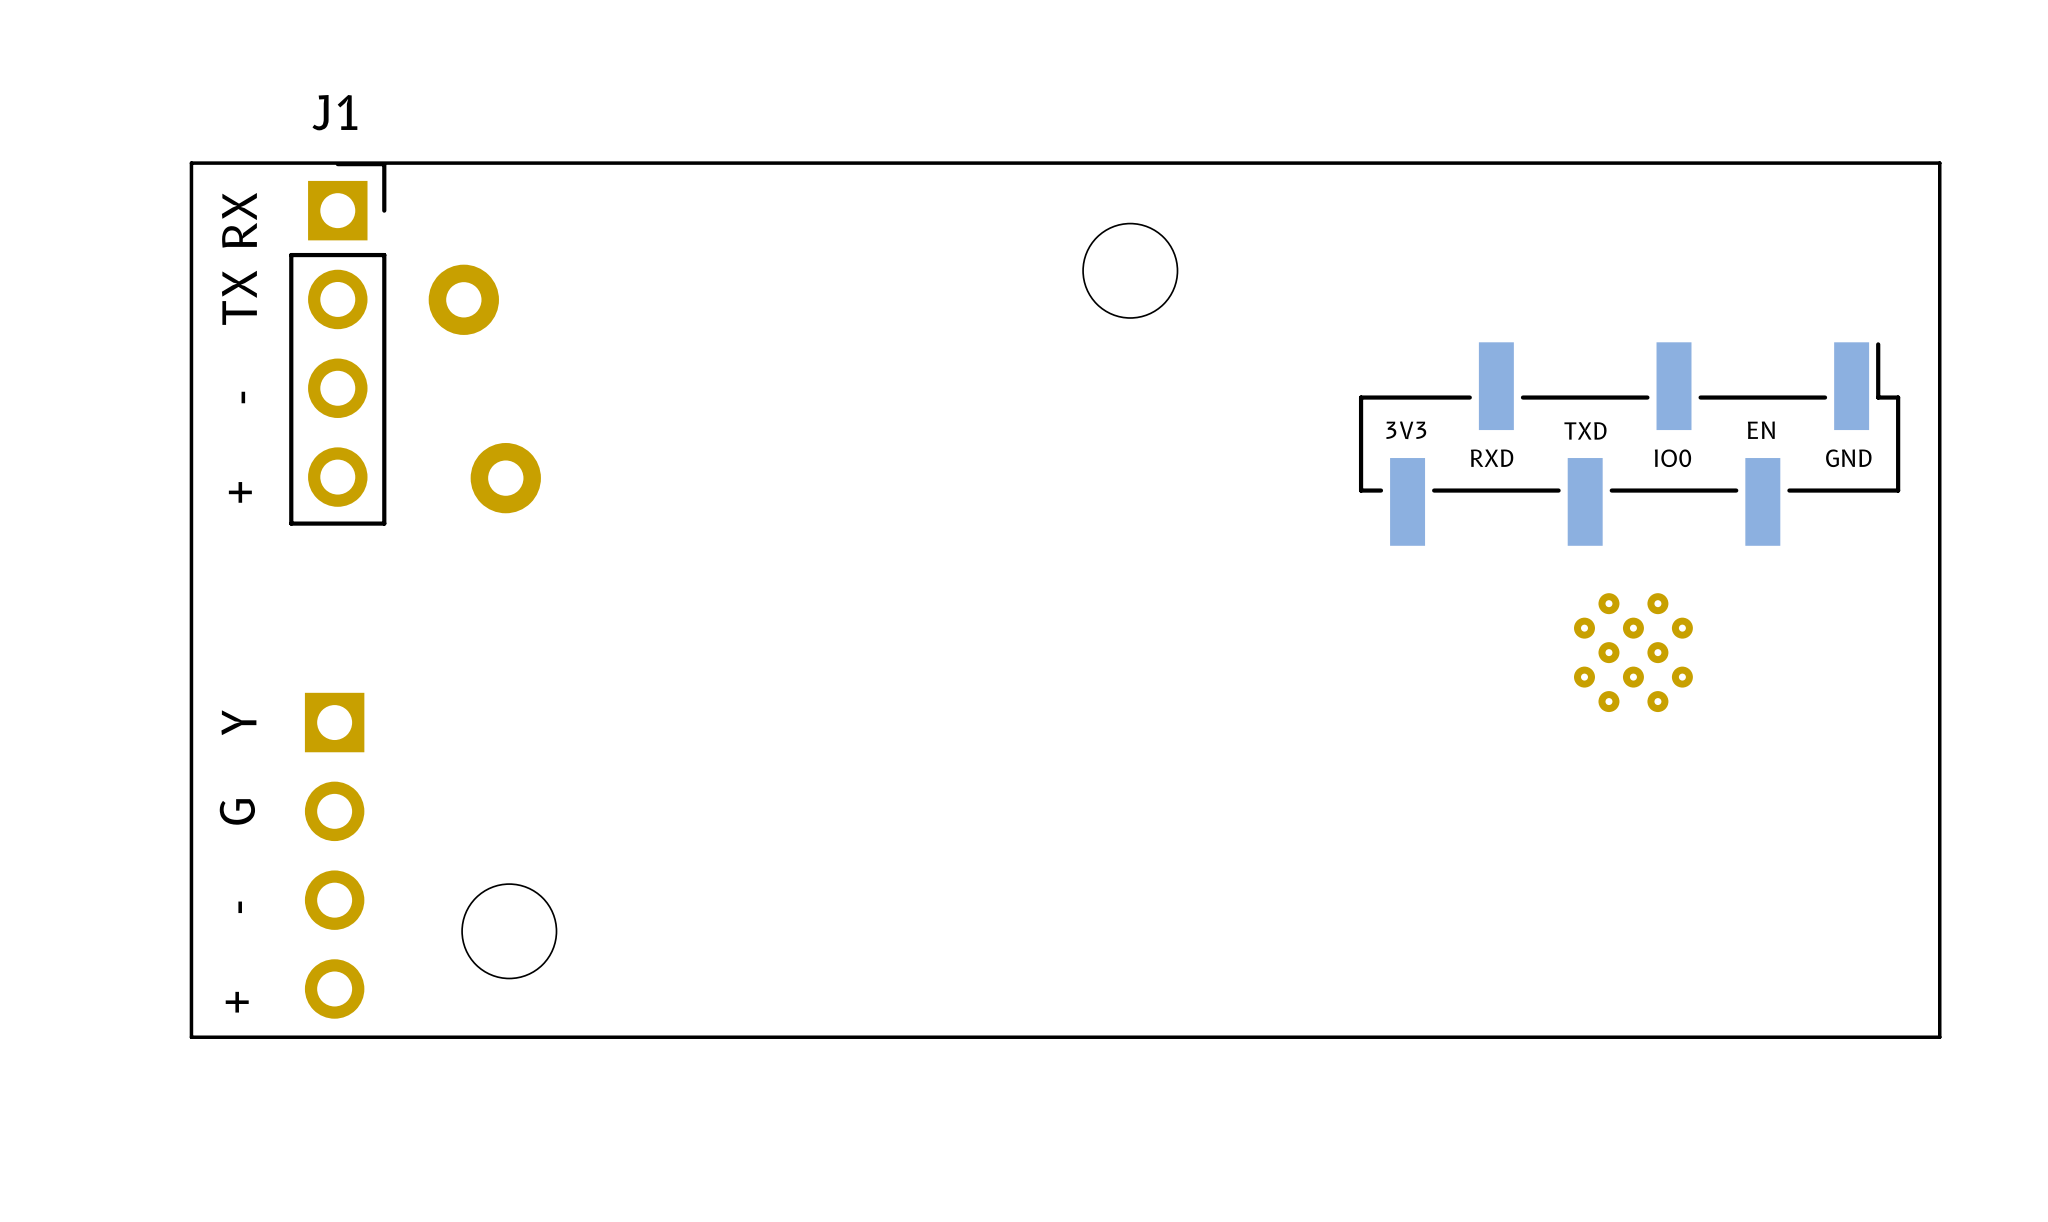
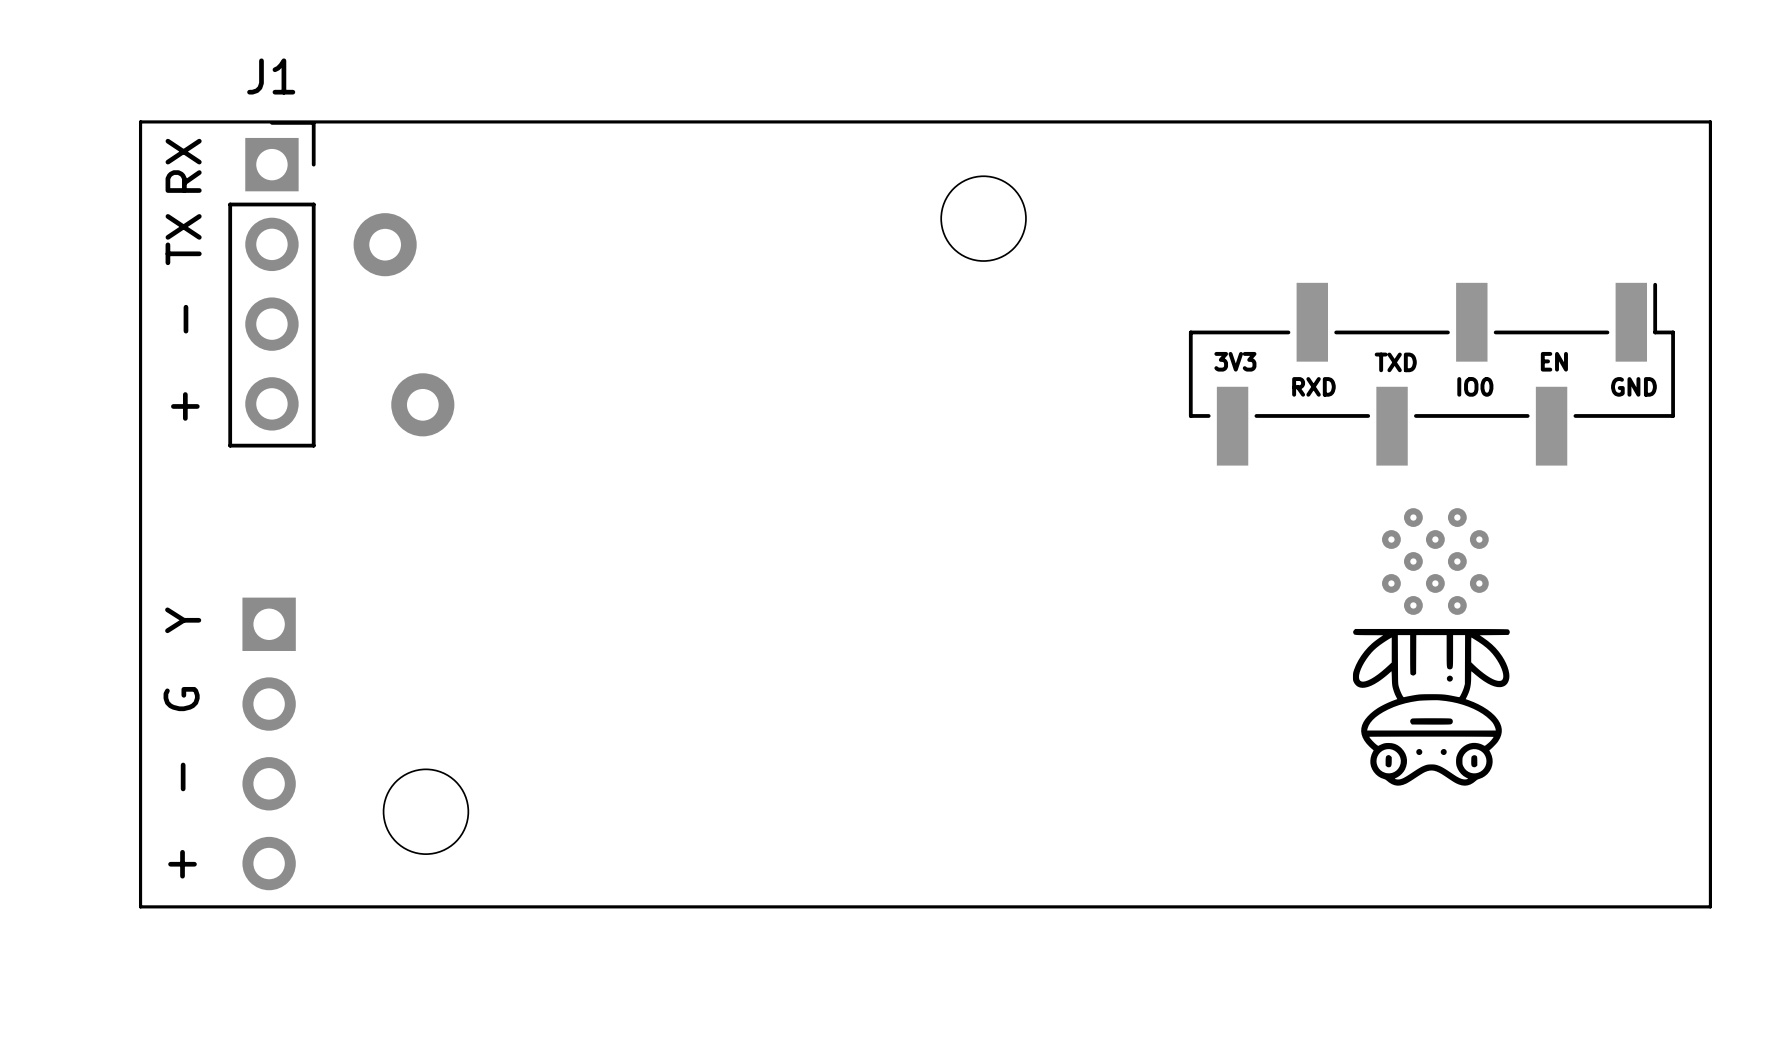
drawing: none -> [1352, 628, 1510, 786]

